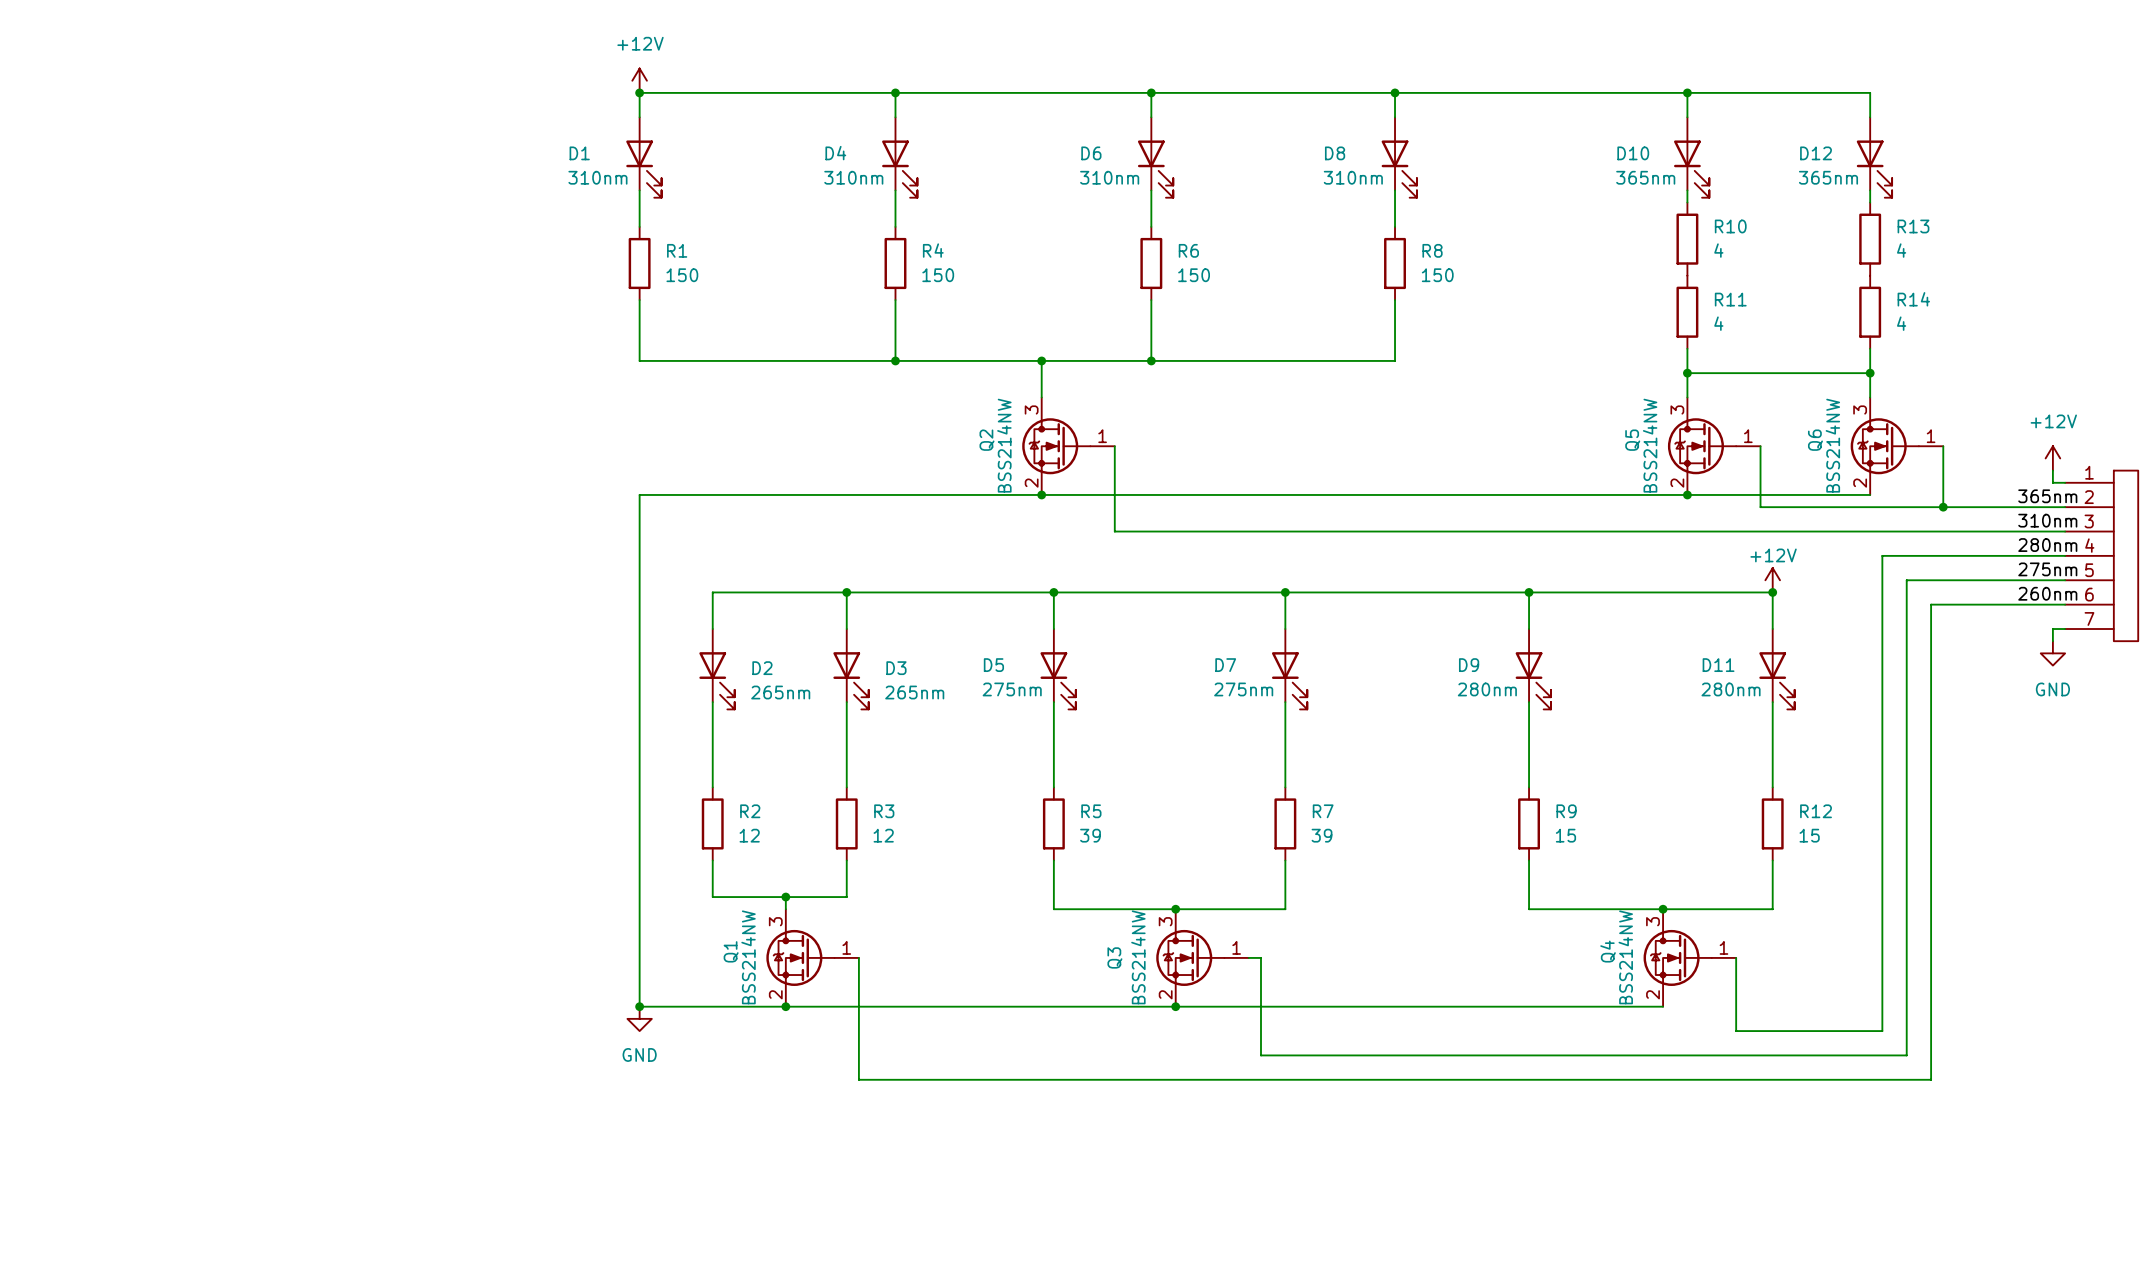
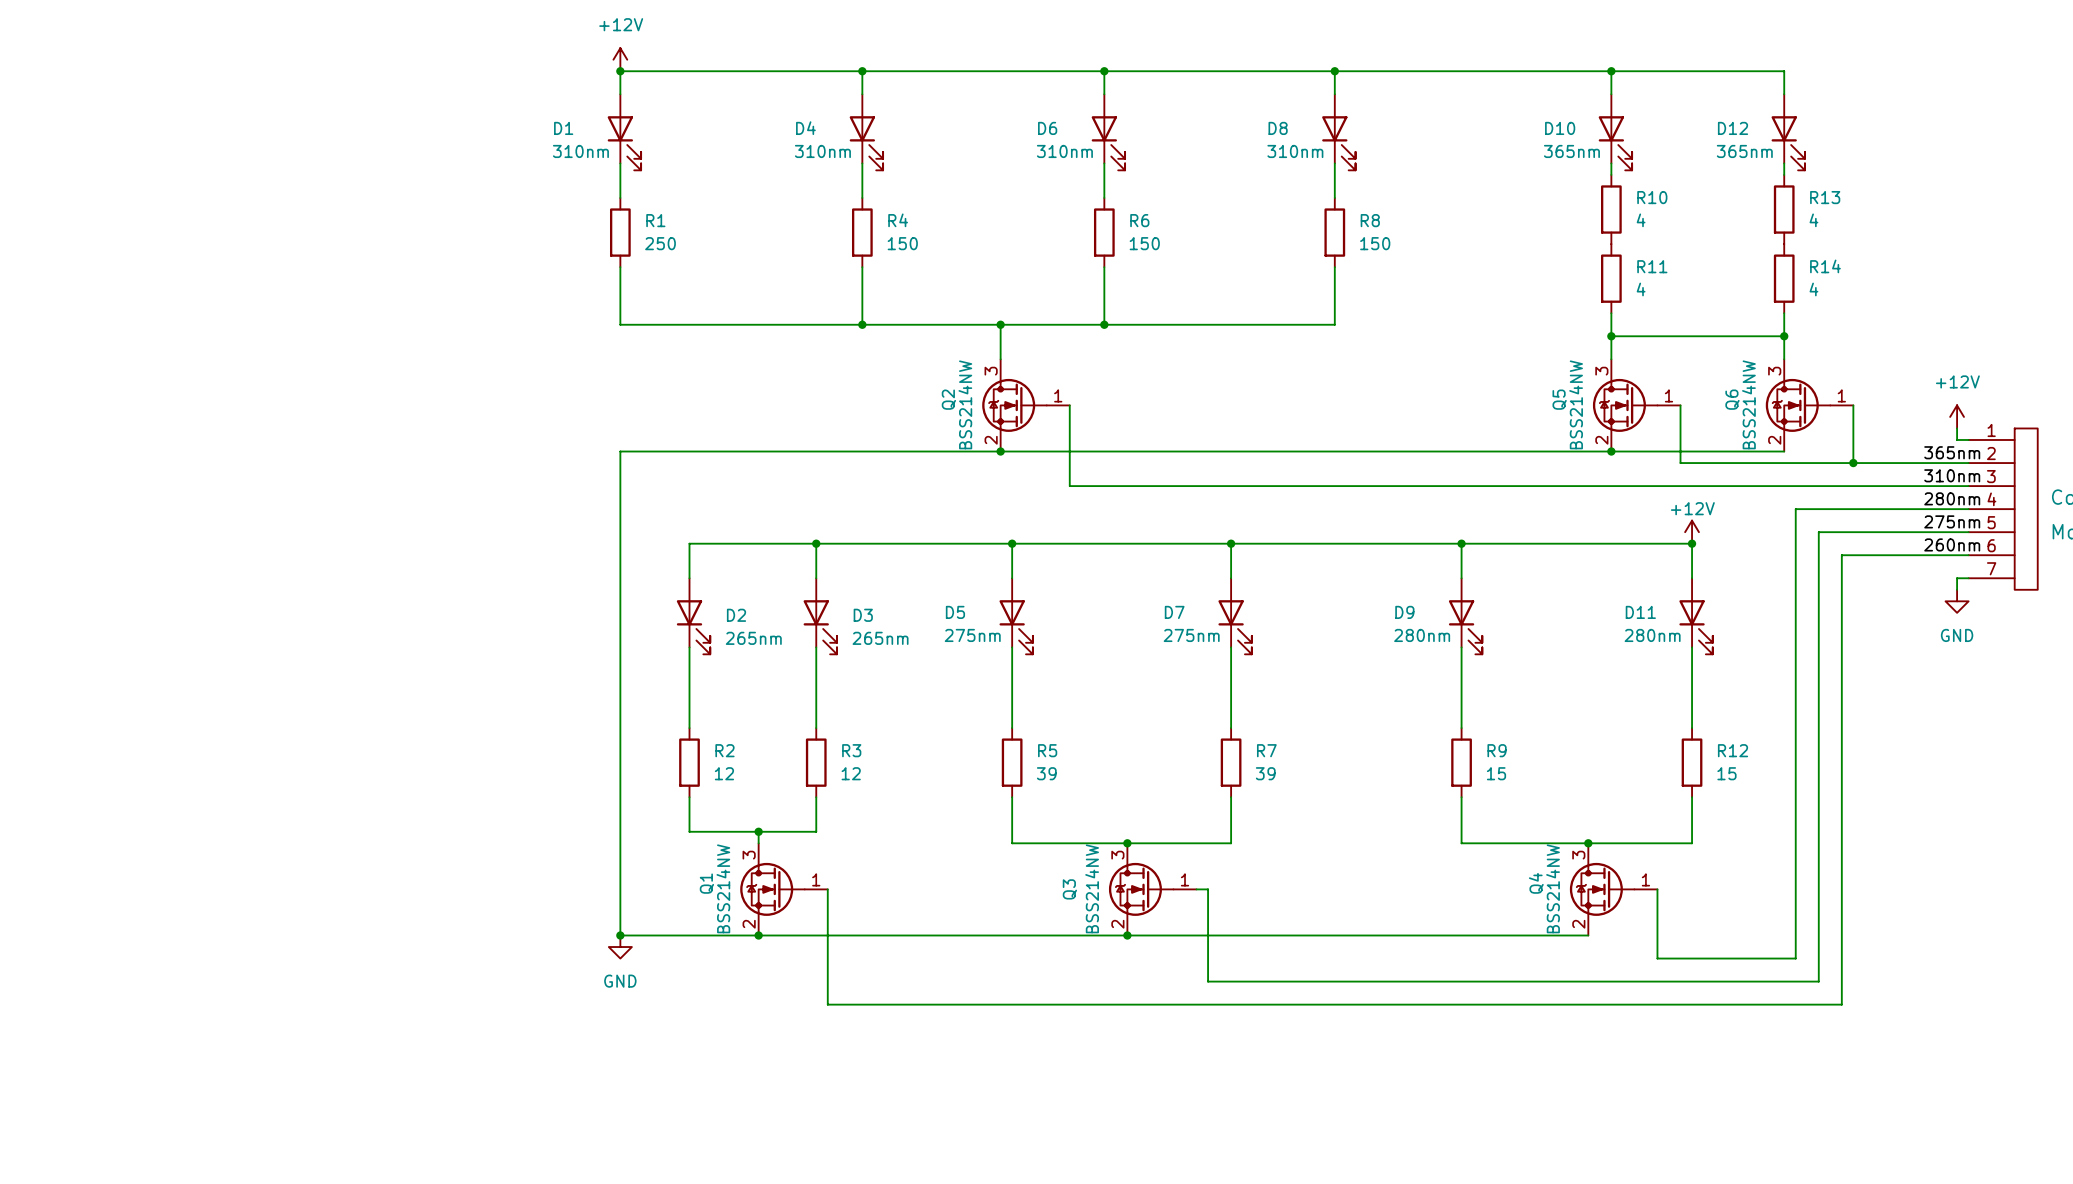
R1 value: 150 (682, 275) -> 250 (660, 243)

